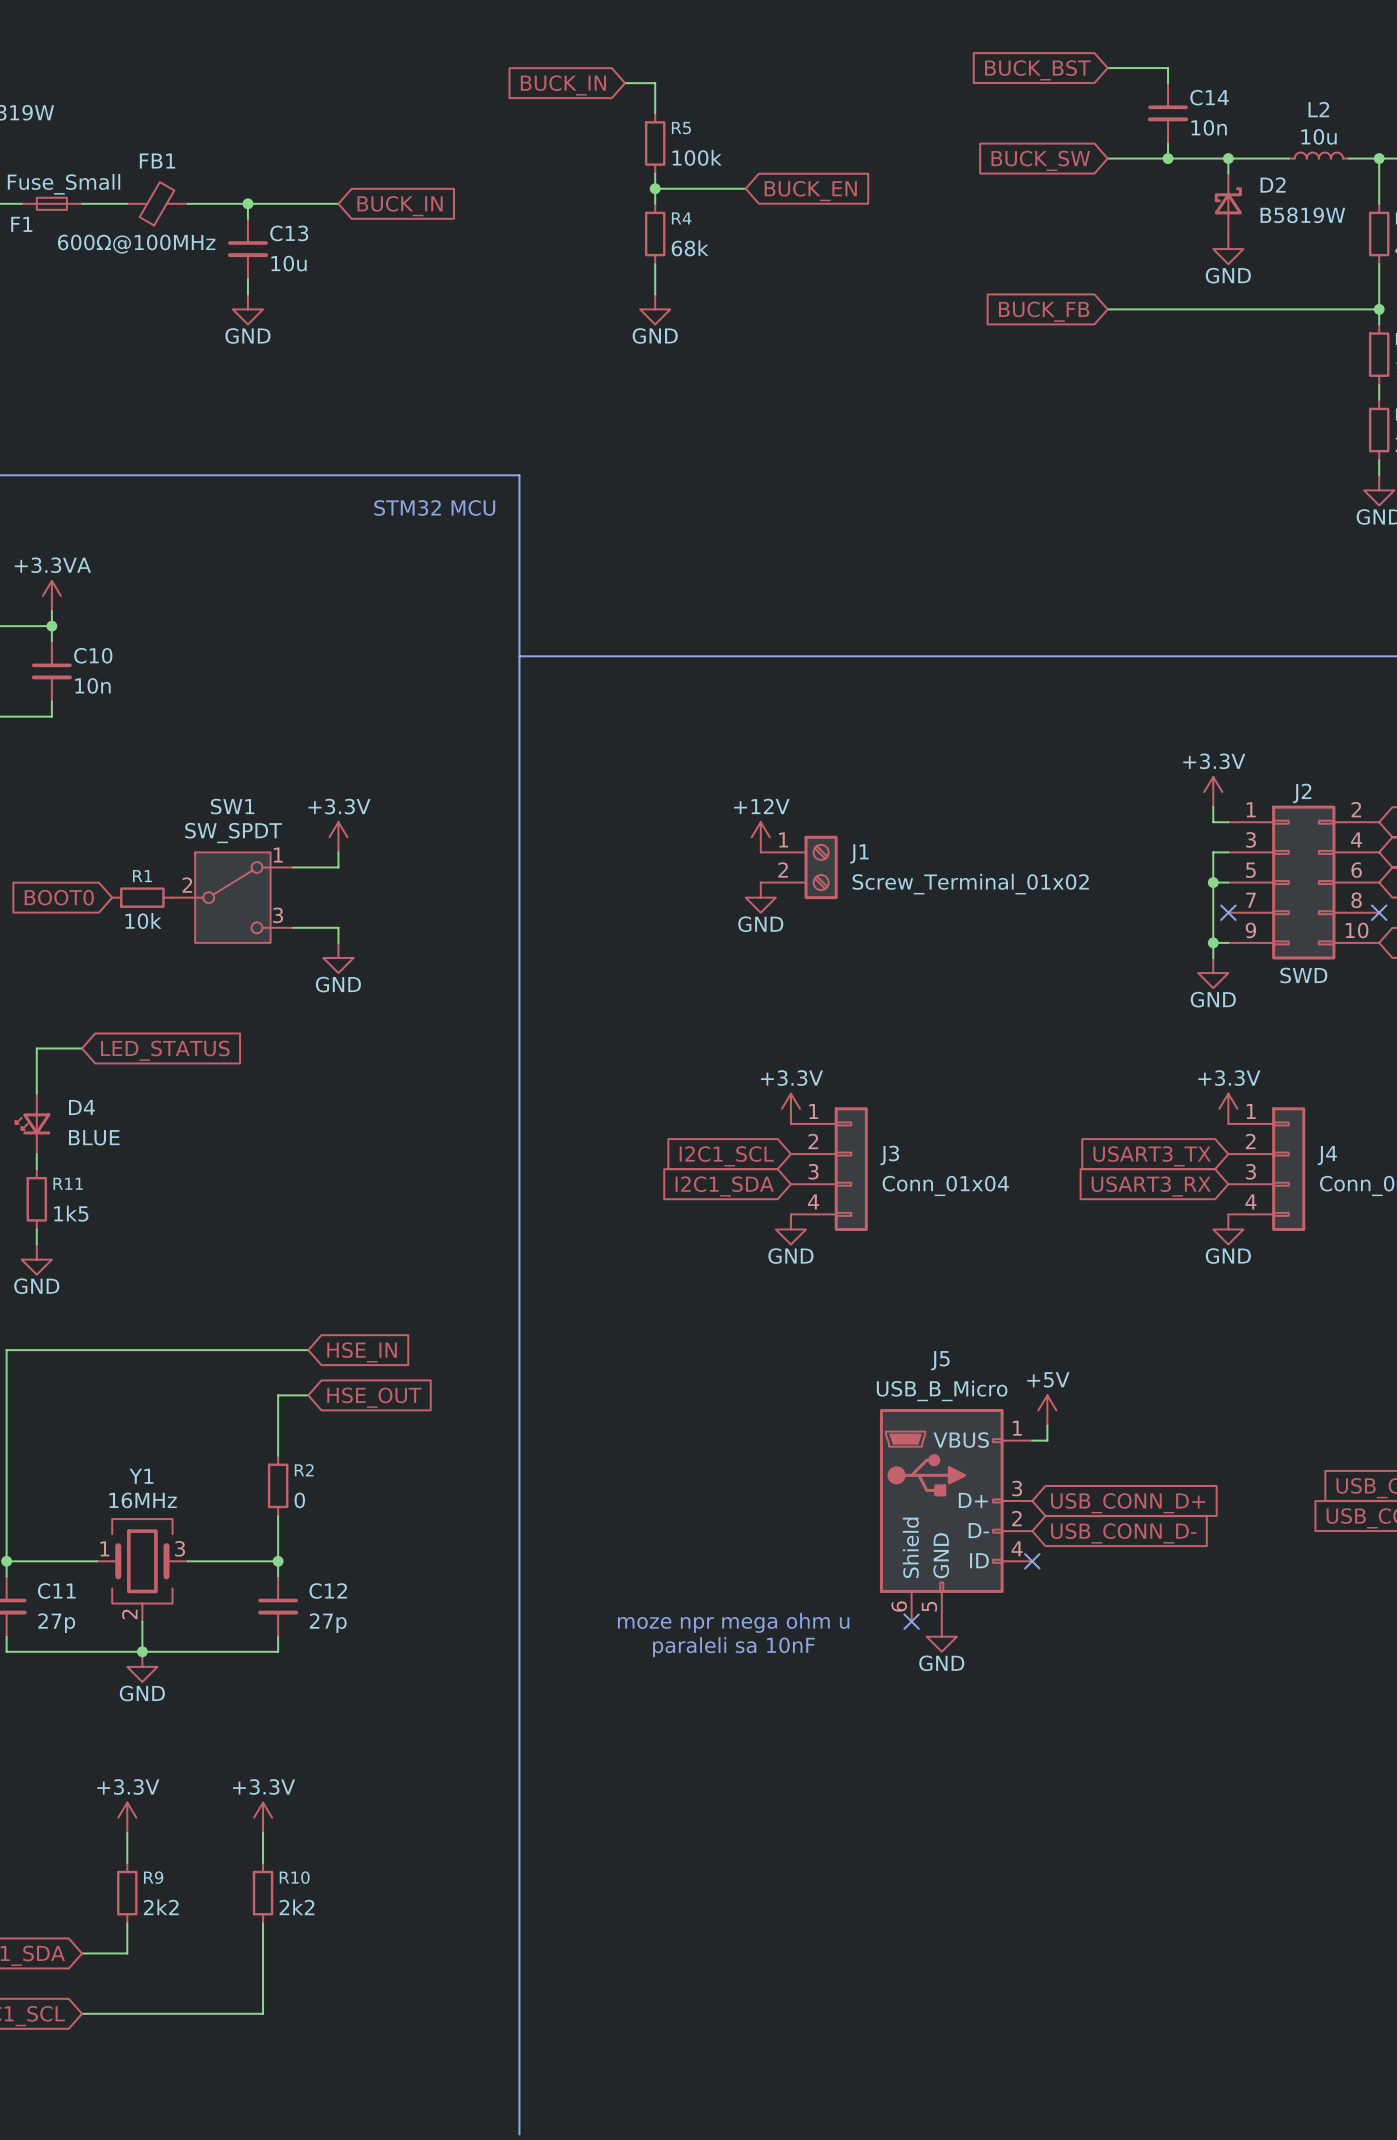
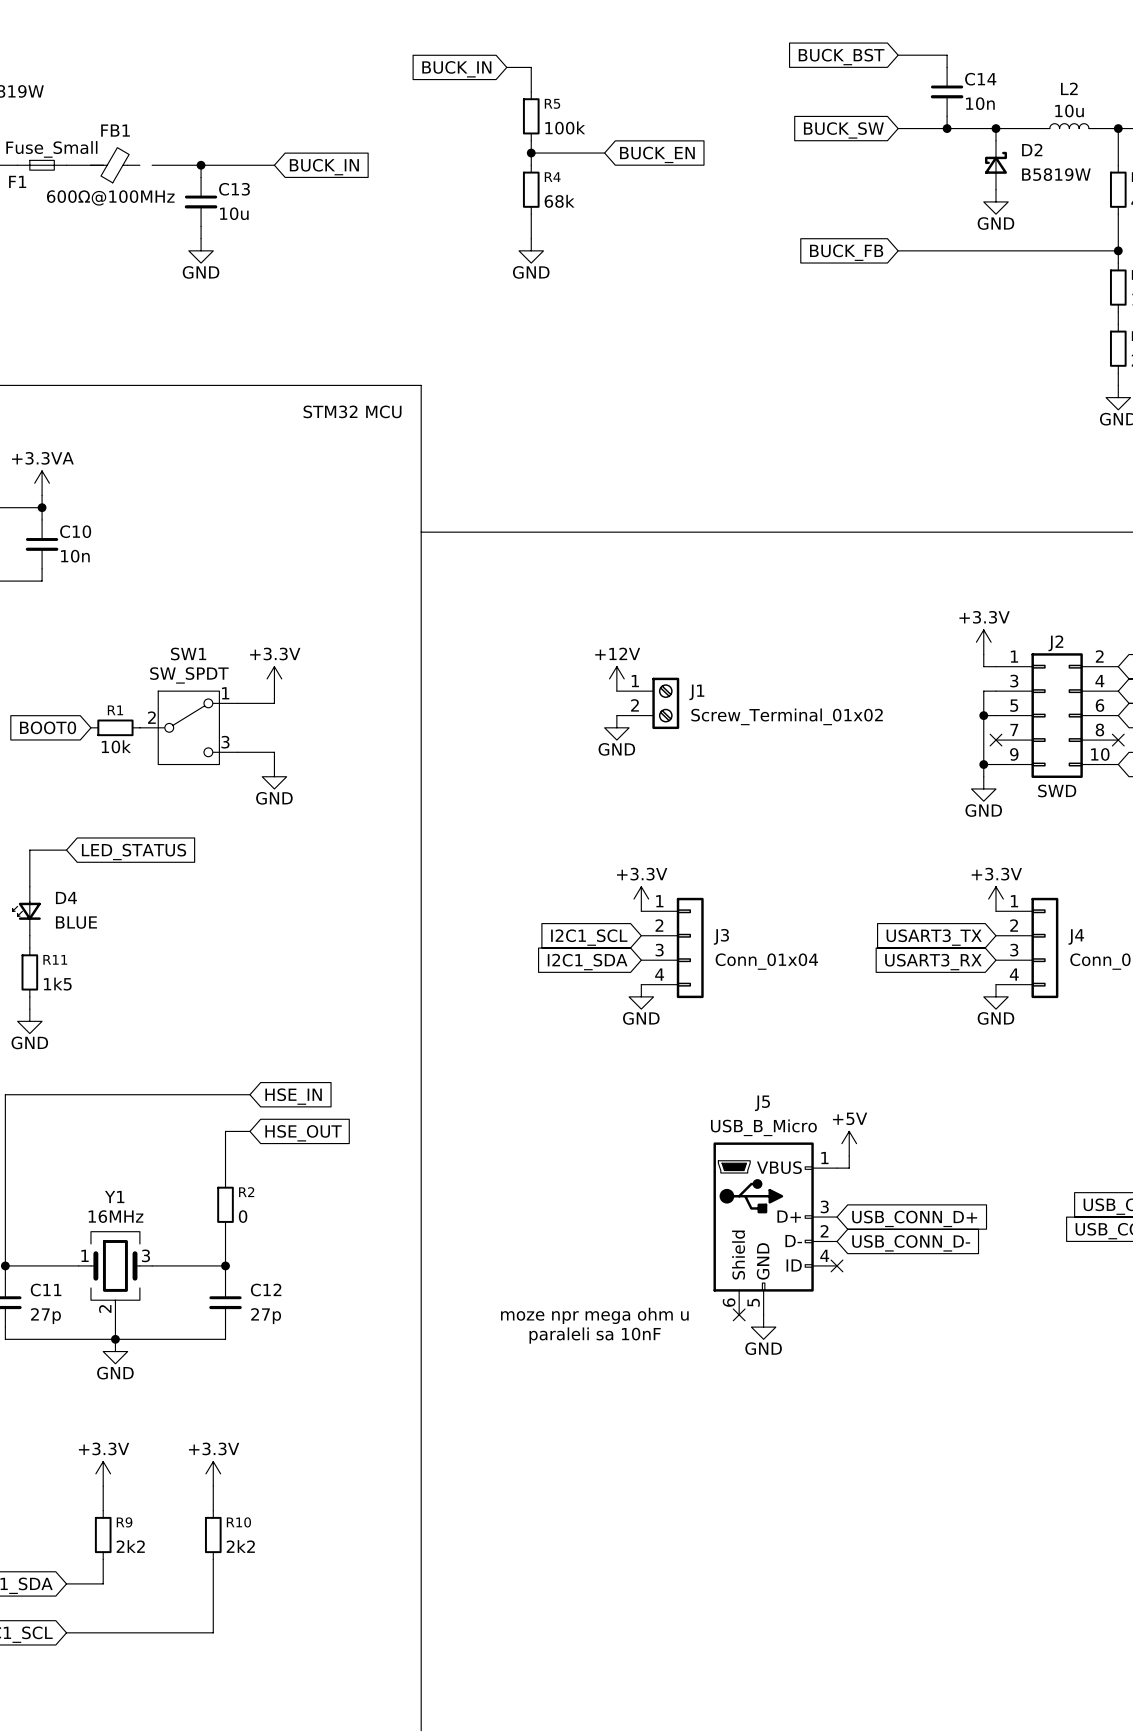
FB1 position: (157, 203) -> (115, 165)

